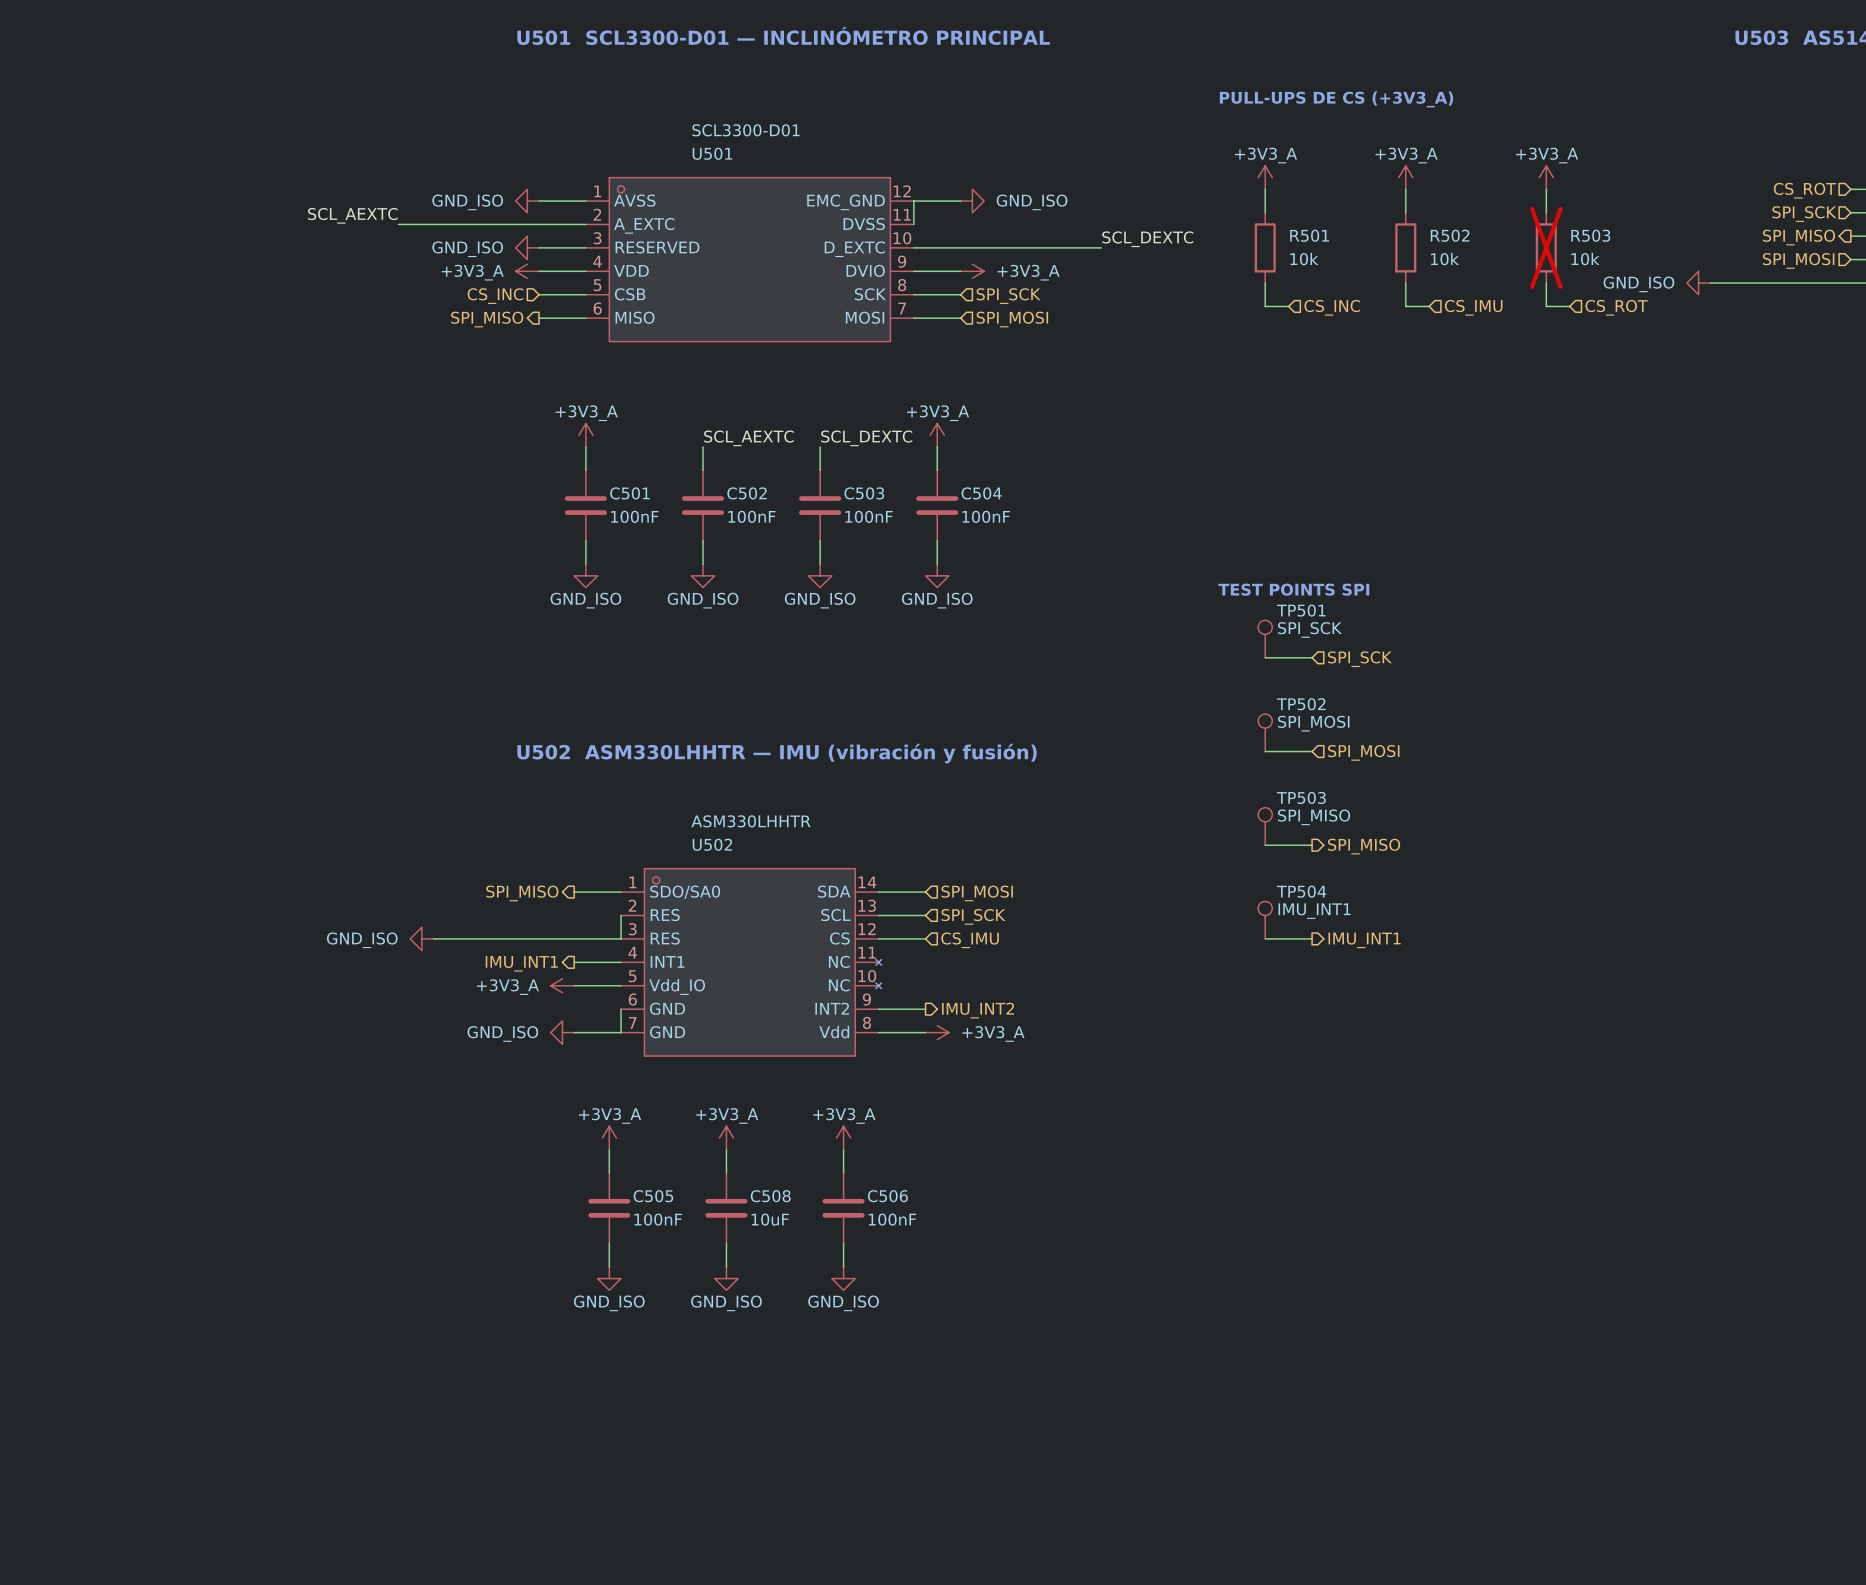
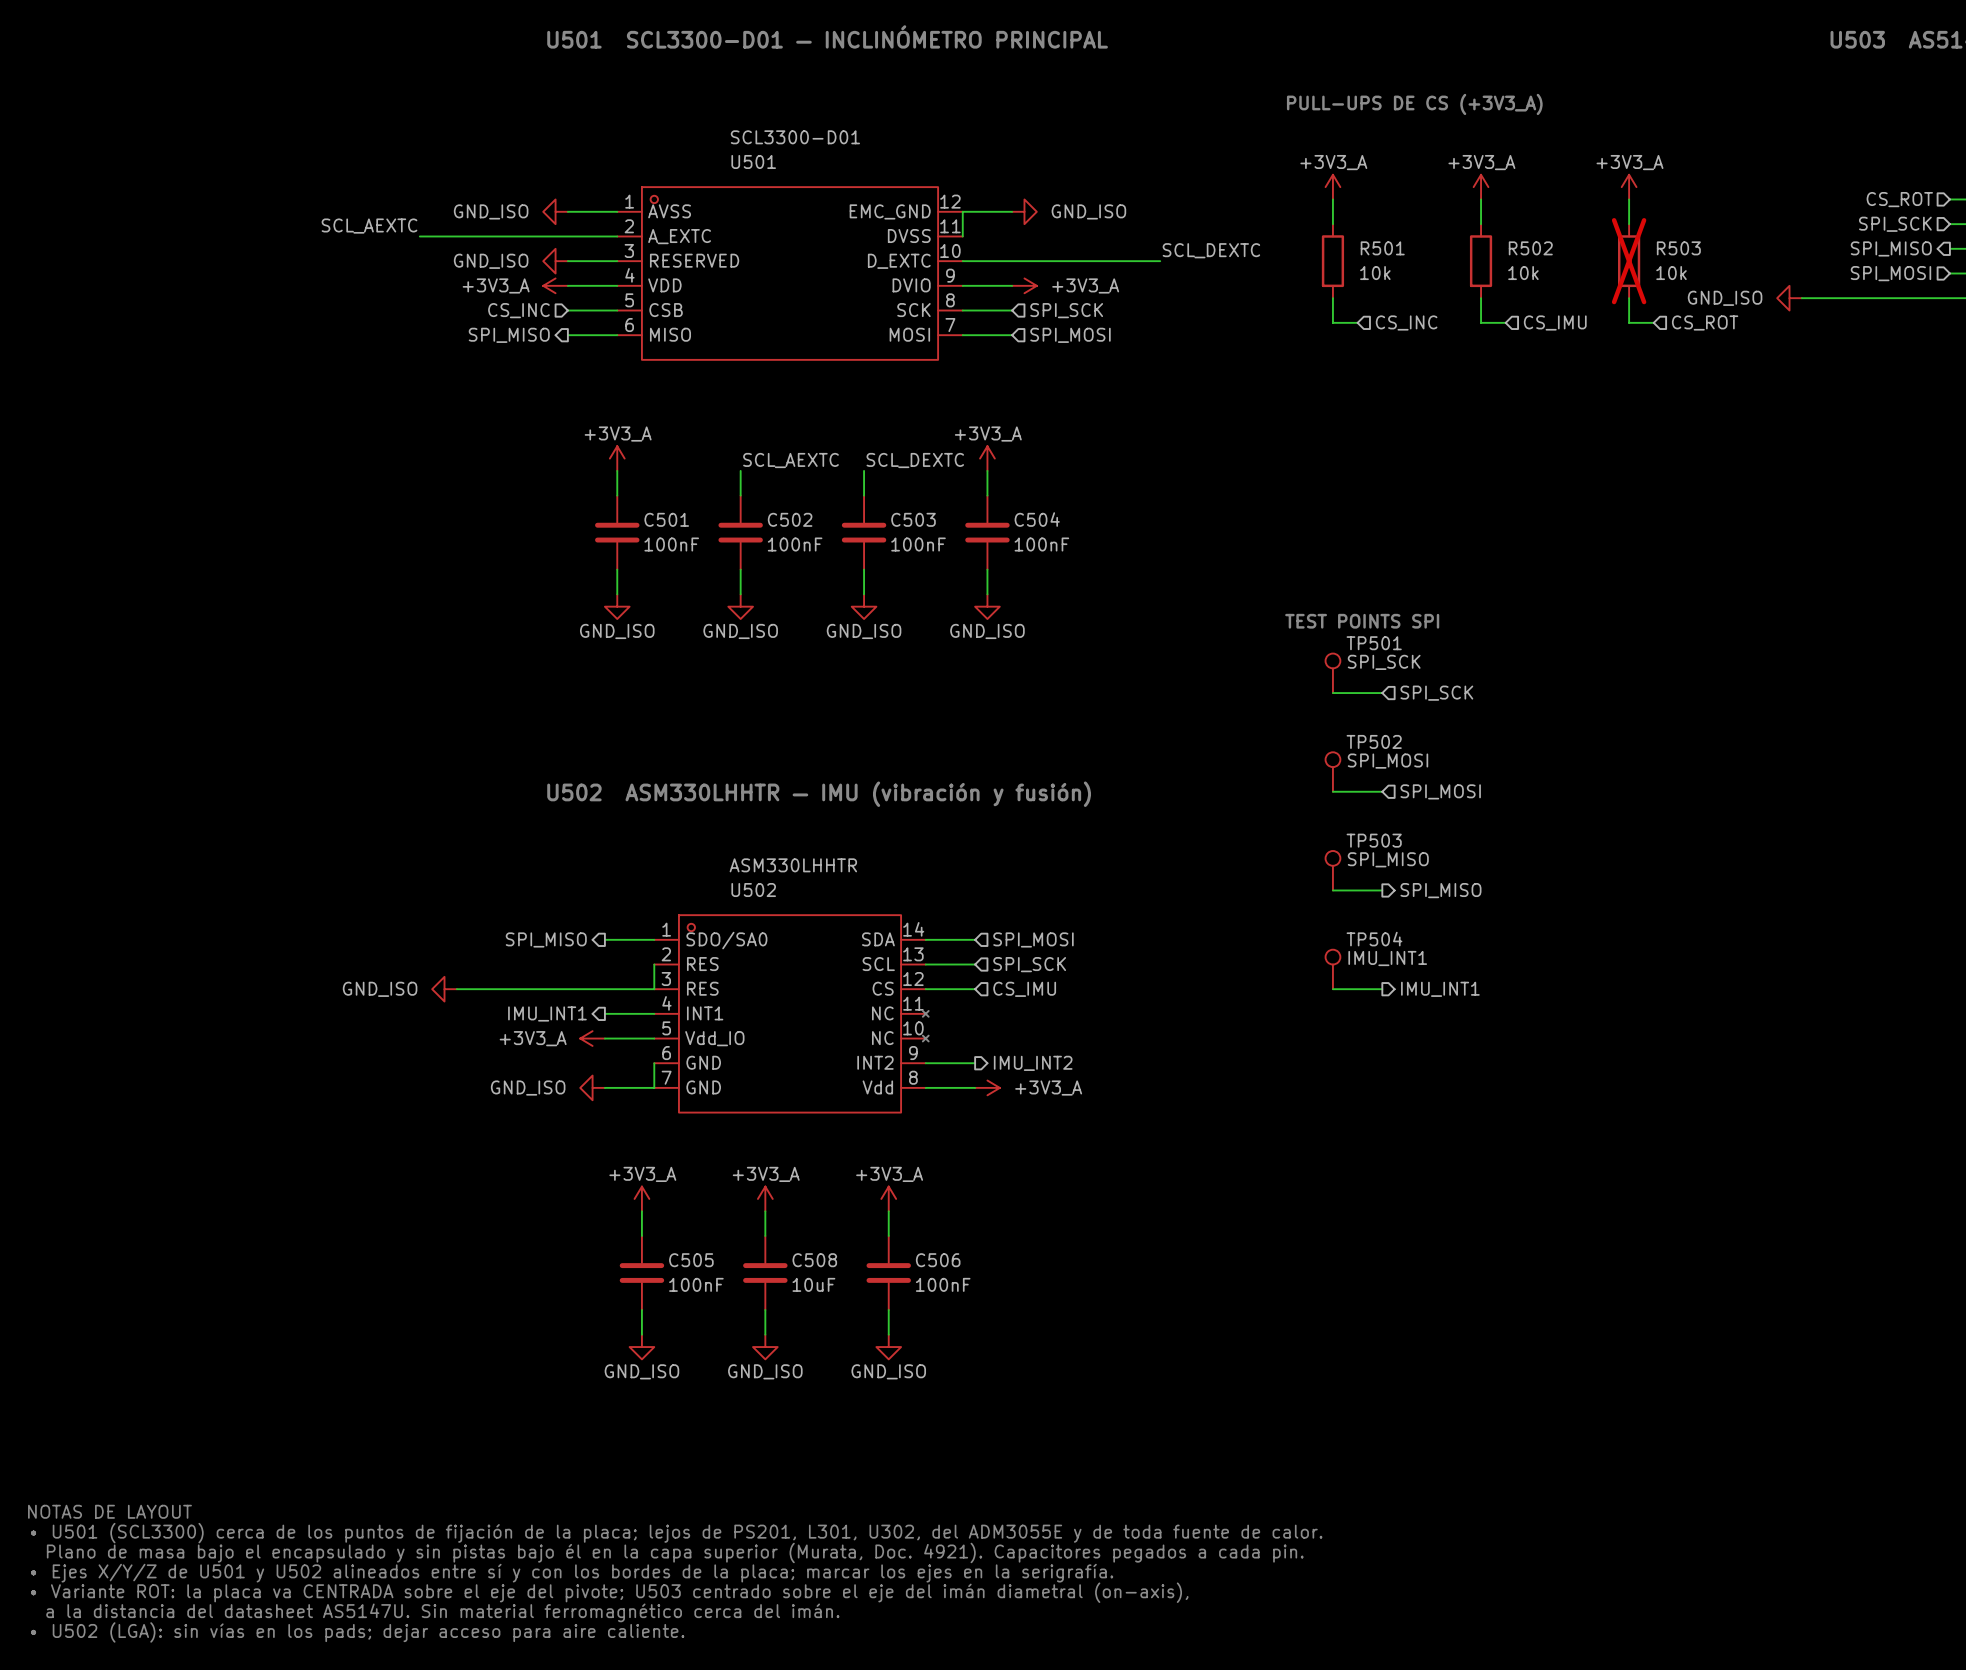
text: none -> NOTAS DE LAYOUT (109, 1511)
text: none -> • U501 (SCL3300) cerca de los puntos de fijación de la placa; lejos de PS201, L301, U302, del ADM3055E y de toda fuente de calor. (676, 1533)
text: none -> Plano de masa bajo el encapsulado y sin pistas bajo él en la capa superior (Murata, Doc. 4921). Capacitores pegados a cada pin. (675, 1552)
text: none -> • Ejes X/Y/Z de U501 y U502 alineados entre sí y con los bordes de la placa; marcar los ejes en la serigrafía. (572, 1573)
text: none -> • Variante ROT: la placa va CENTRADA sobre el eje del pivote; U503 centrado sobre el eje del imán diametral (on-axis), (609, 1592)
text: none -> a la distancia del datasheet AS5147U. Sin material ferromagnético cerca del imán. (442, 1612)
text: none -> • U502 (LGA): sin vías en los pads; dejar acceso para aire caliente. (357, 1632)

